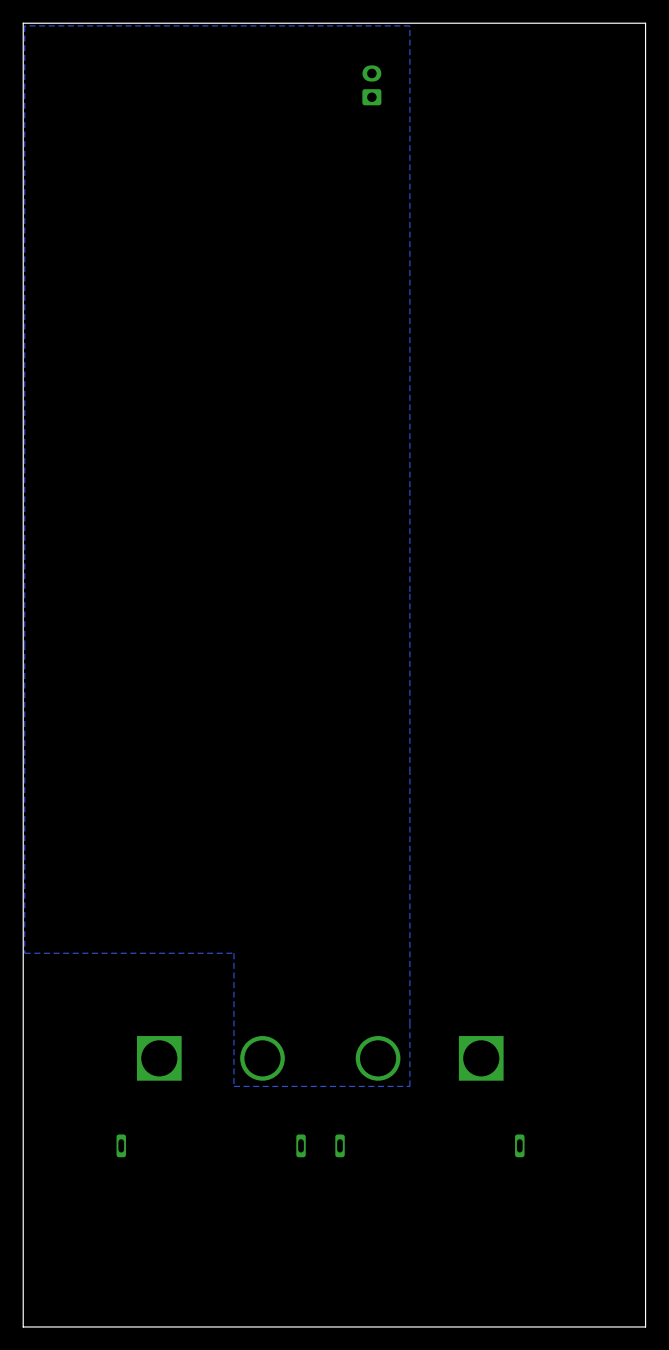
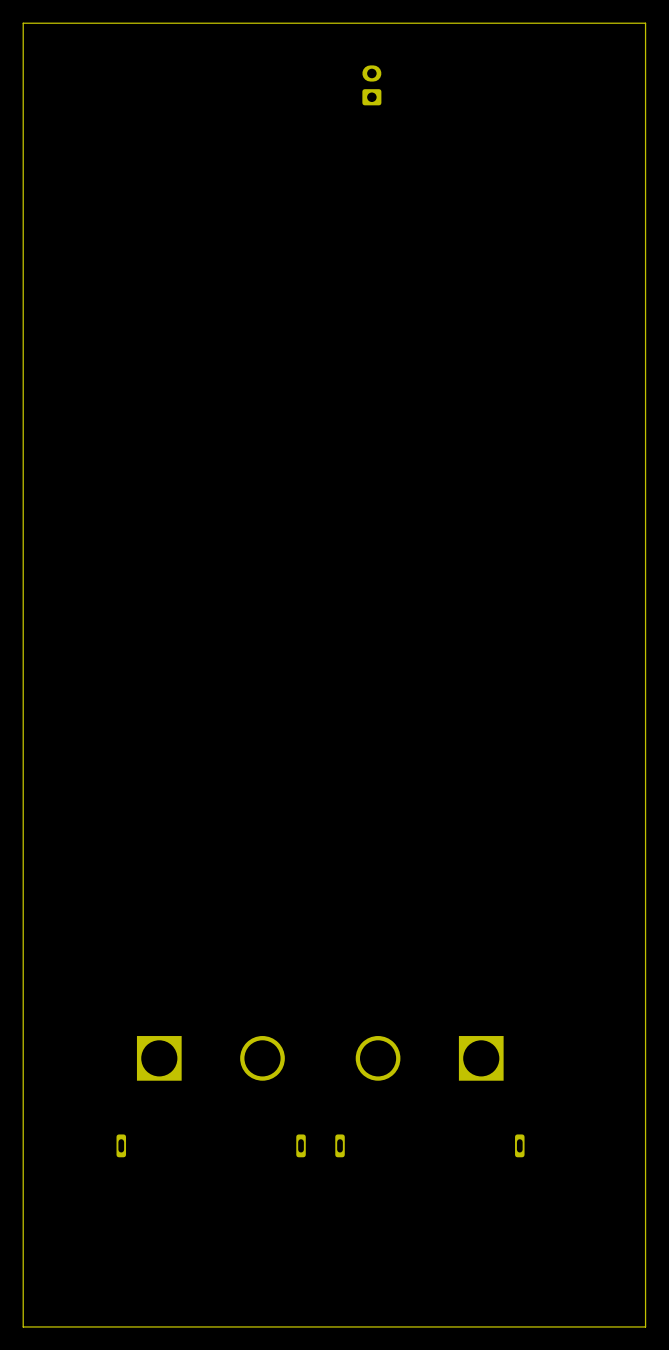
zone outline: (409, 25) (409, 1086) (233, 1086) (233, 953) (24, 953) (24, 25) (409, 25) -> none

